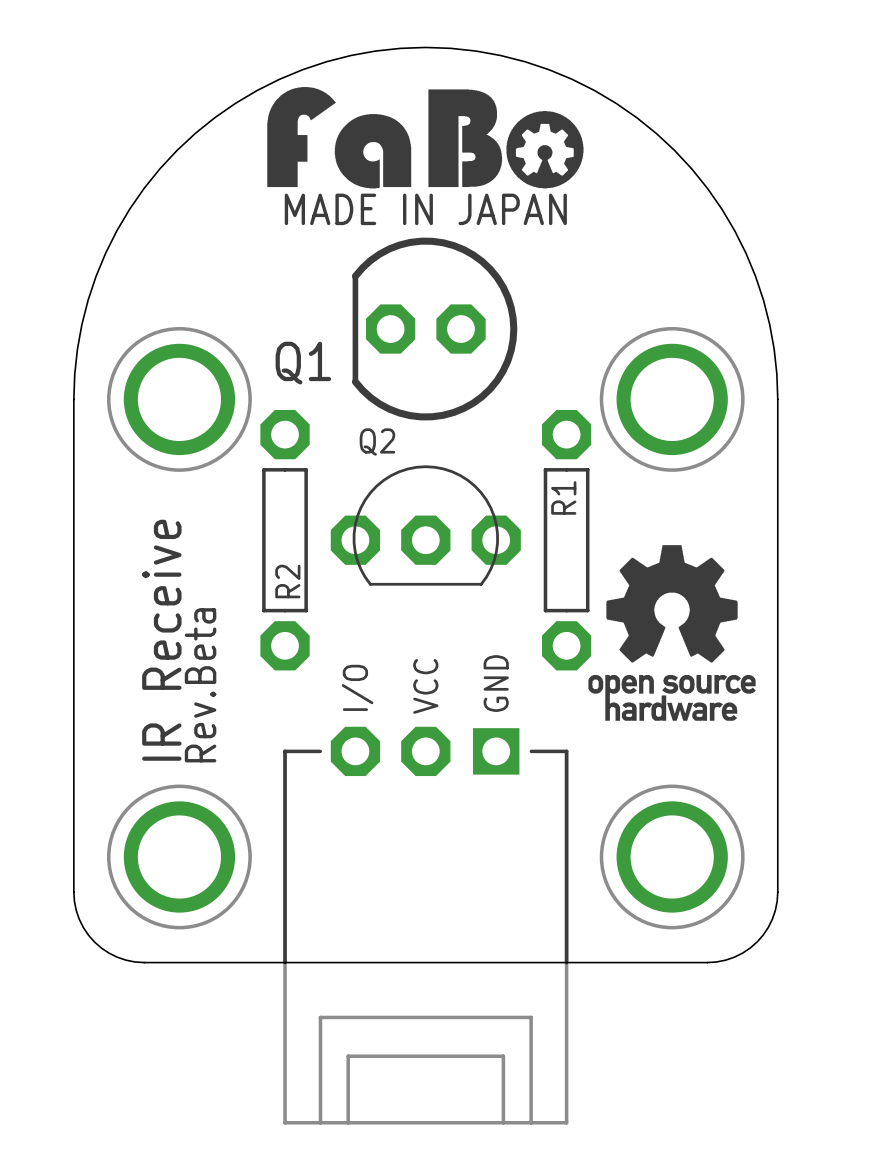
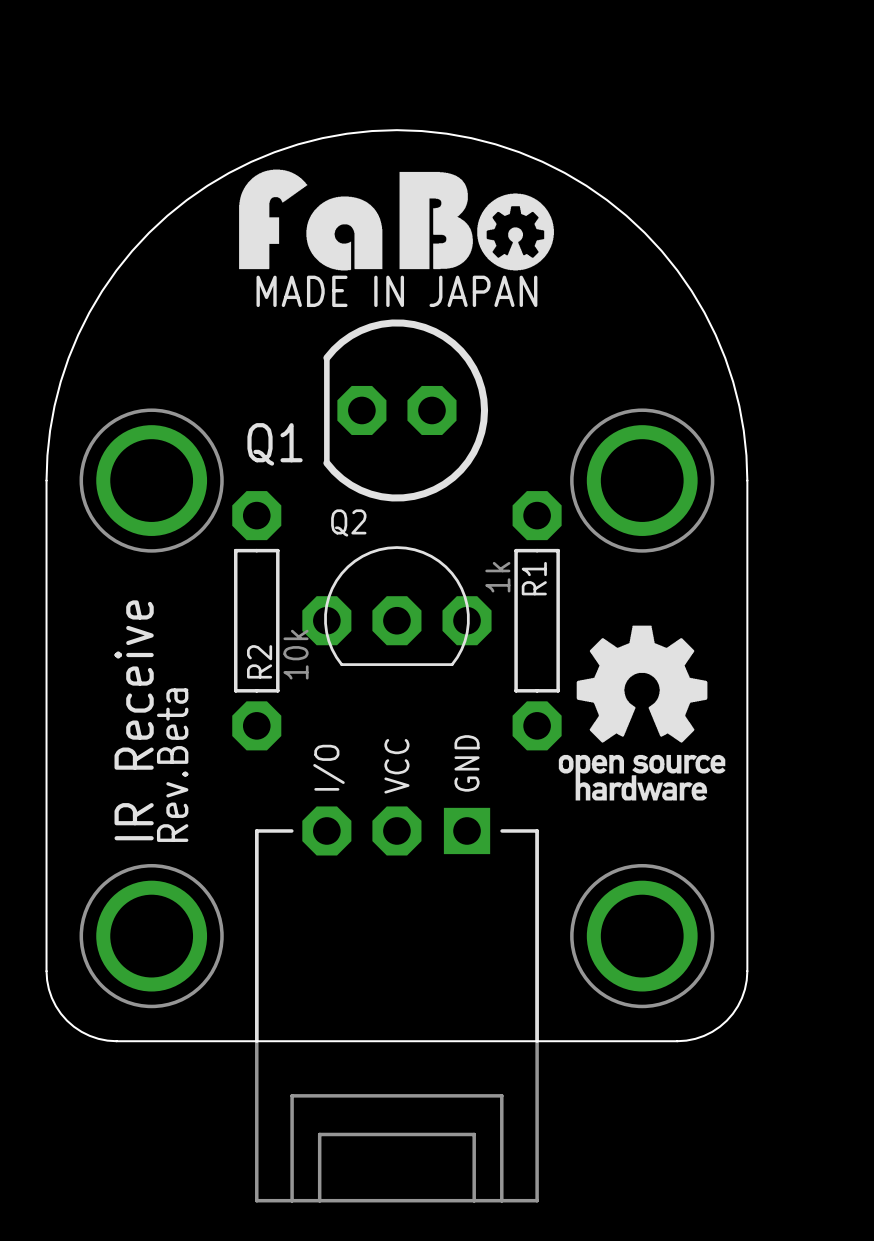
R1 value: none -> 1k (497, 577)
R2 value: none -> 10k (296, 654)

